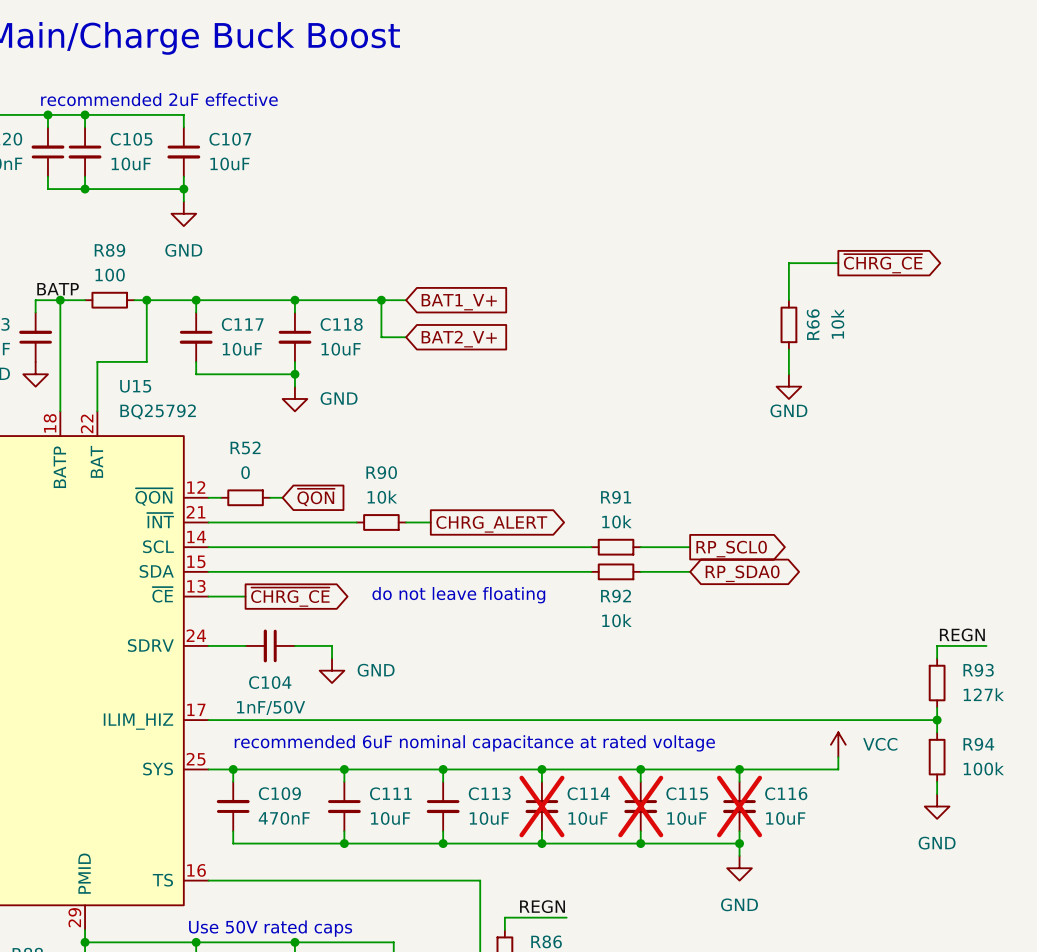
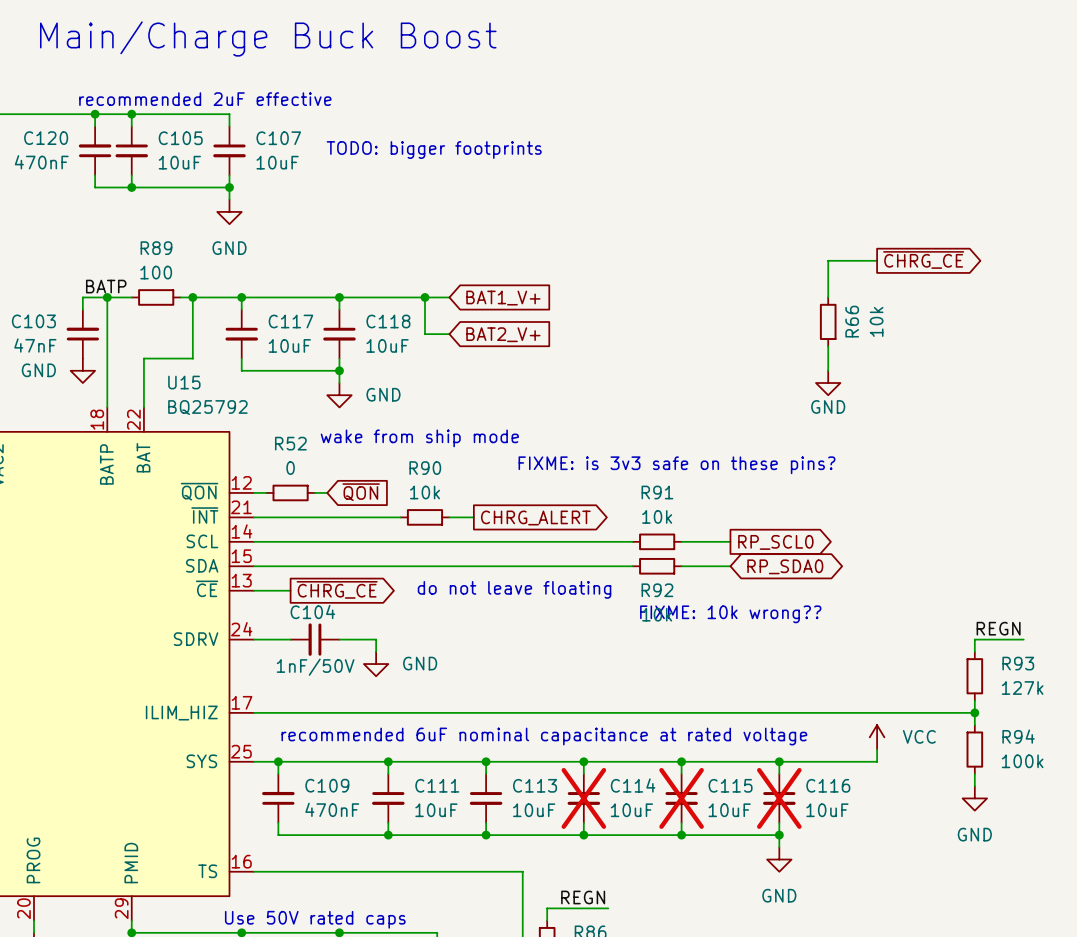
text: none -> TODO: bigger footprints (434, 150)
text: none -> wake from ship mode (419, 438)
text: none -> FIXME: is 3v3 safe on these pins? (676, 465)
text: none -> FIXME: 10k wrong?? (730, 614)
C104 name position: C104 (270, 682) -> C104 (312, 611)
C104 value position: 1nF/50V (271, 707) -> 1nF/50V (315, 667)

